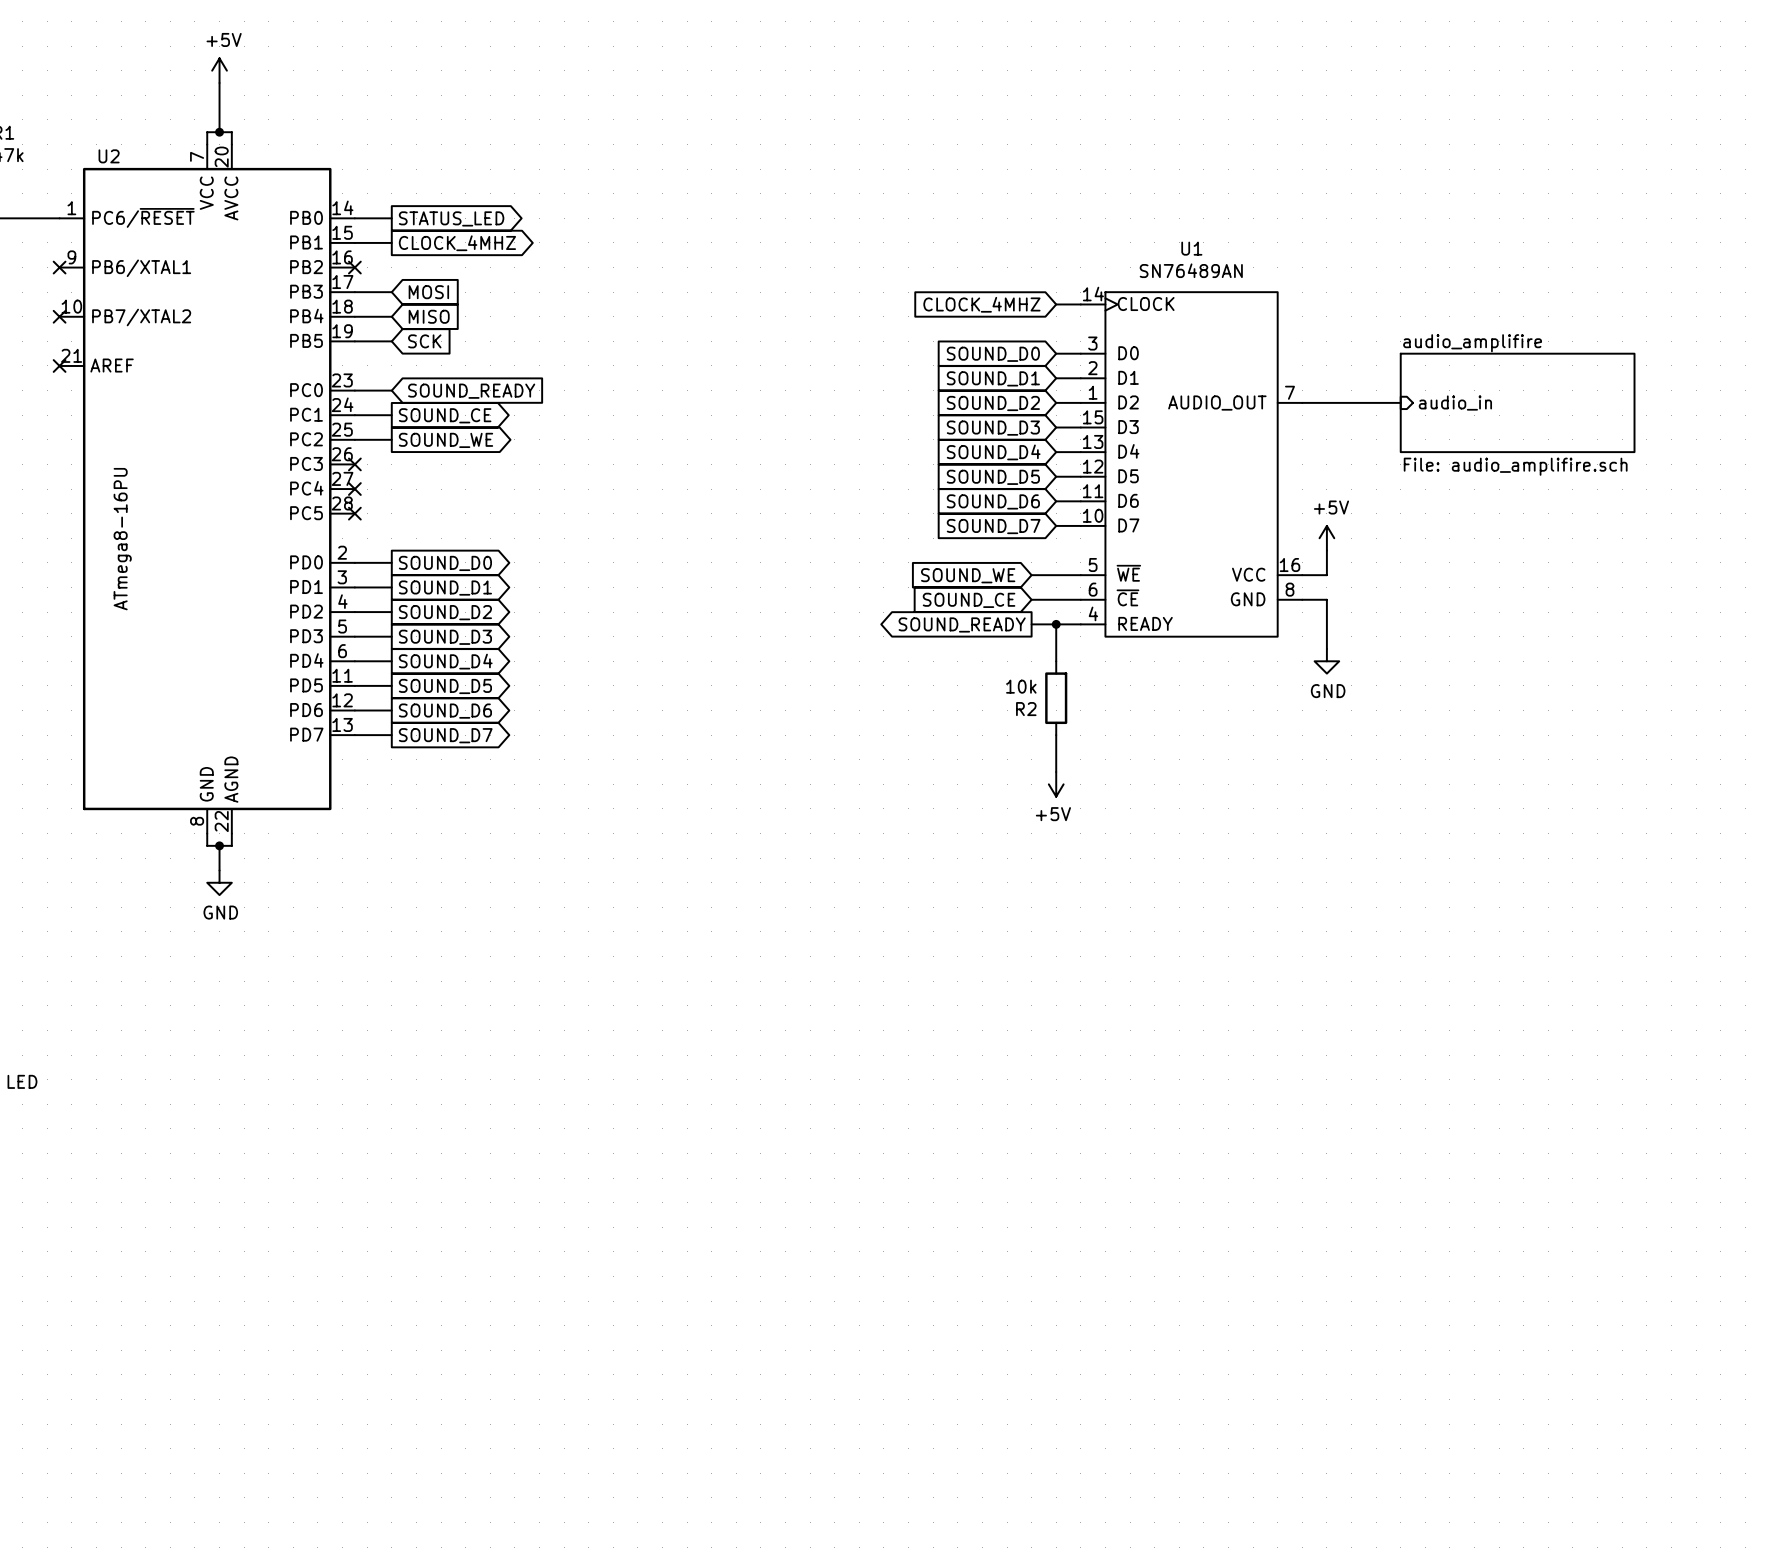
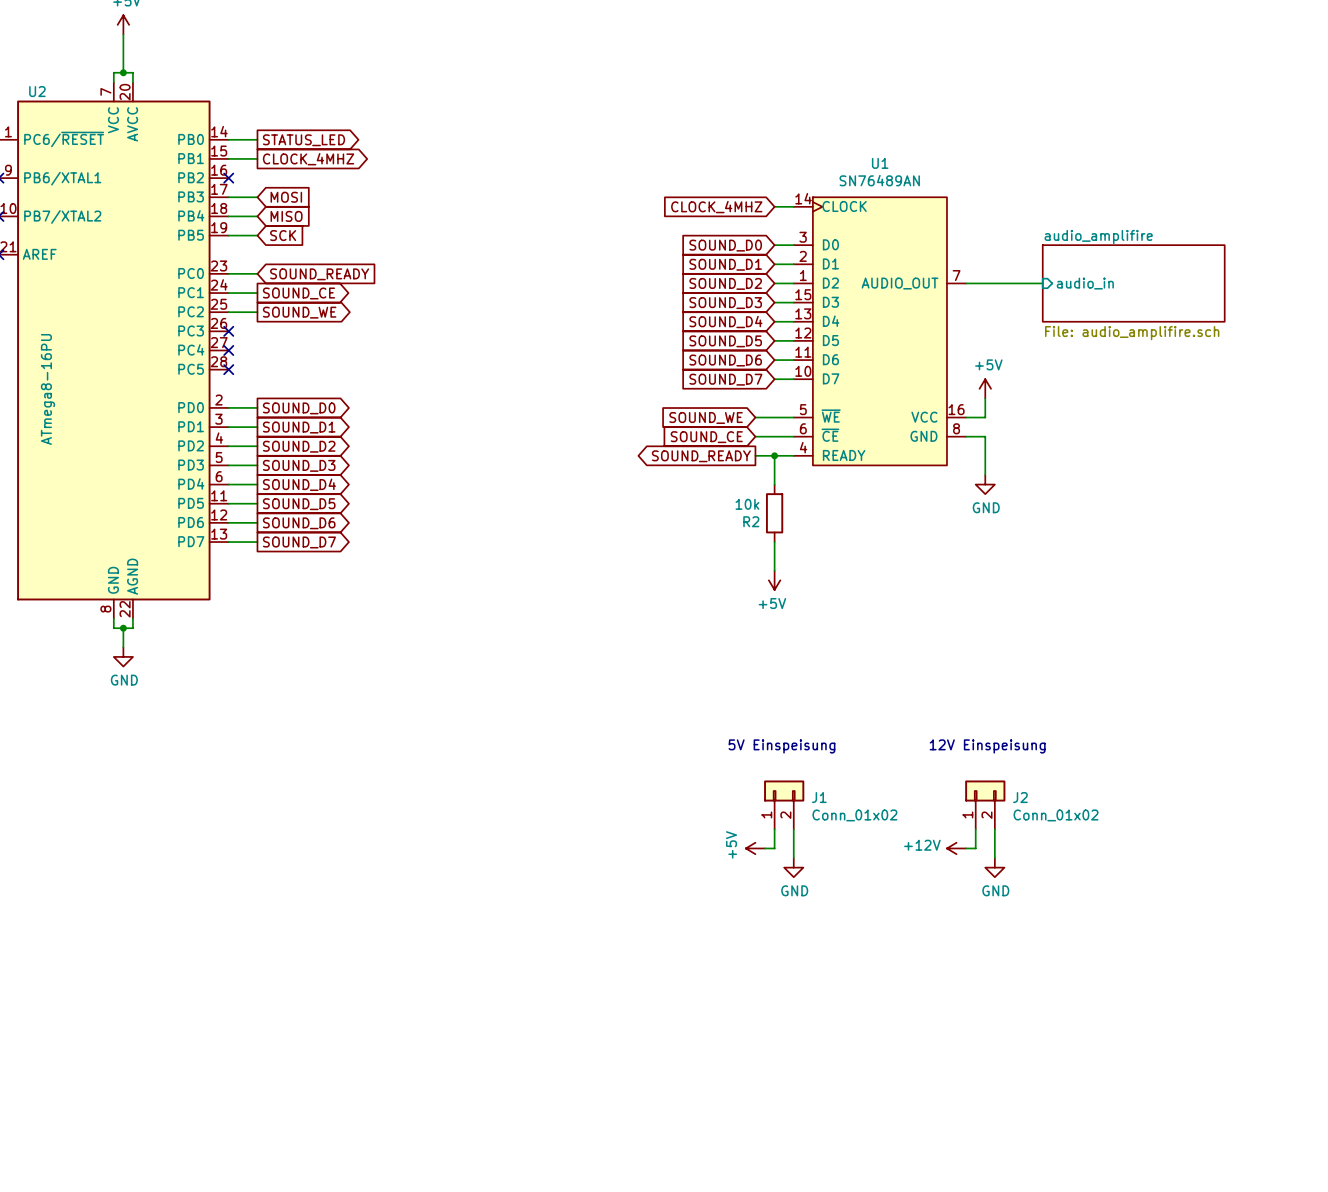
text: none -> 5V Einspeisung (781, 746)
text: none -> 12V Einspeisung (987, 746)
J1: none -> Conn_01x02 (784, 804)
J2: none -> Conn_01x02 (985, 804)
wire: none -> (774, 829) (774, 848) (765, 848)
wire: none -> (793, 829) (793, 858)
wire: none -> (975, 829) (975, 848) (966, 848)
wire: none -> (994, 829) (994, 858)
power symbol: none -> +5V (755, 848)
power symbol: none -> +12V (956, 848)
power symbol: none -> GND (793, 867)
power symbol: none -> GND (994, 867)

